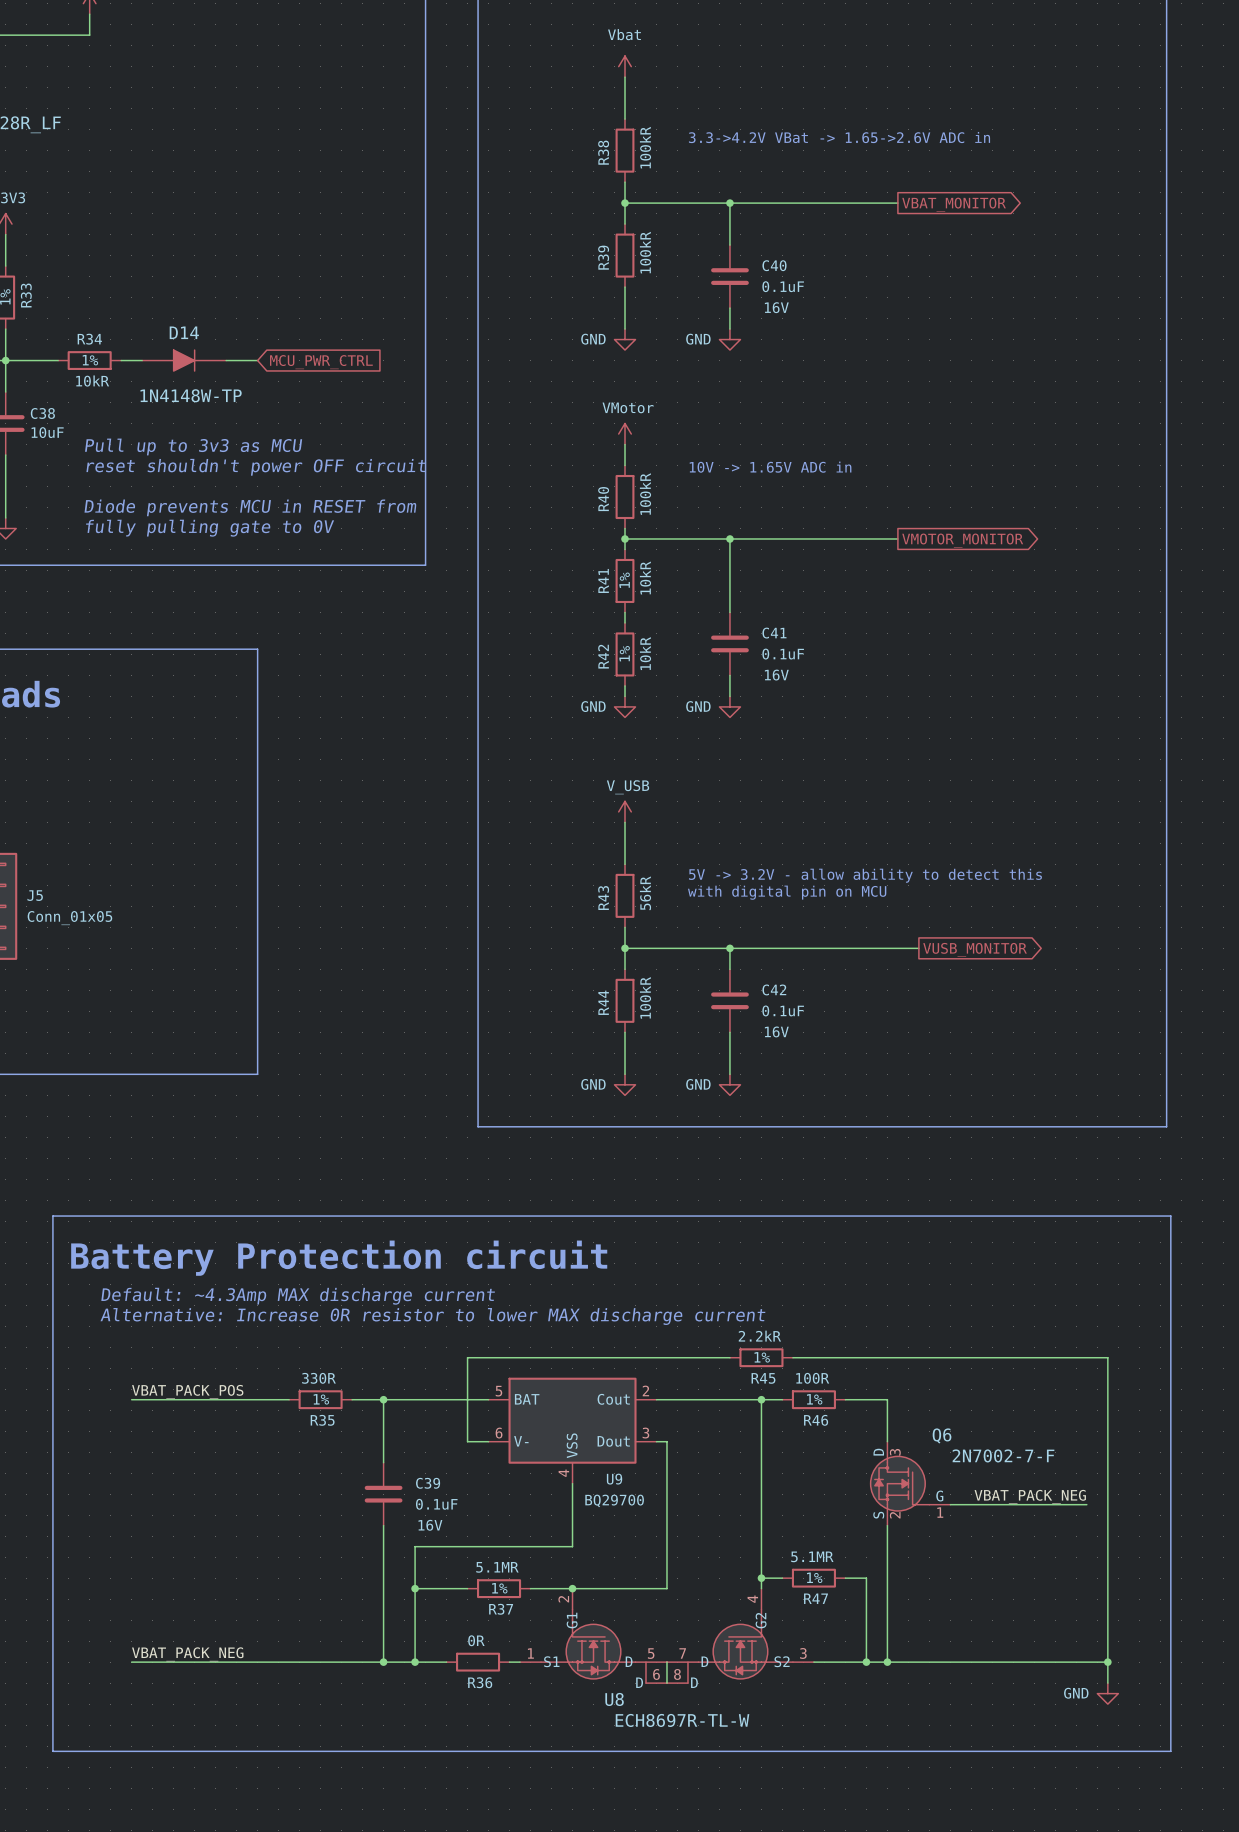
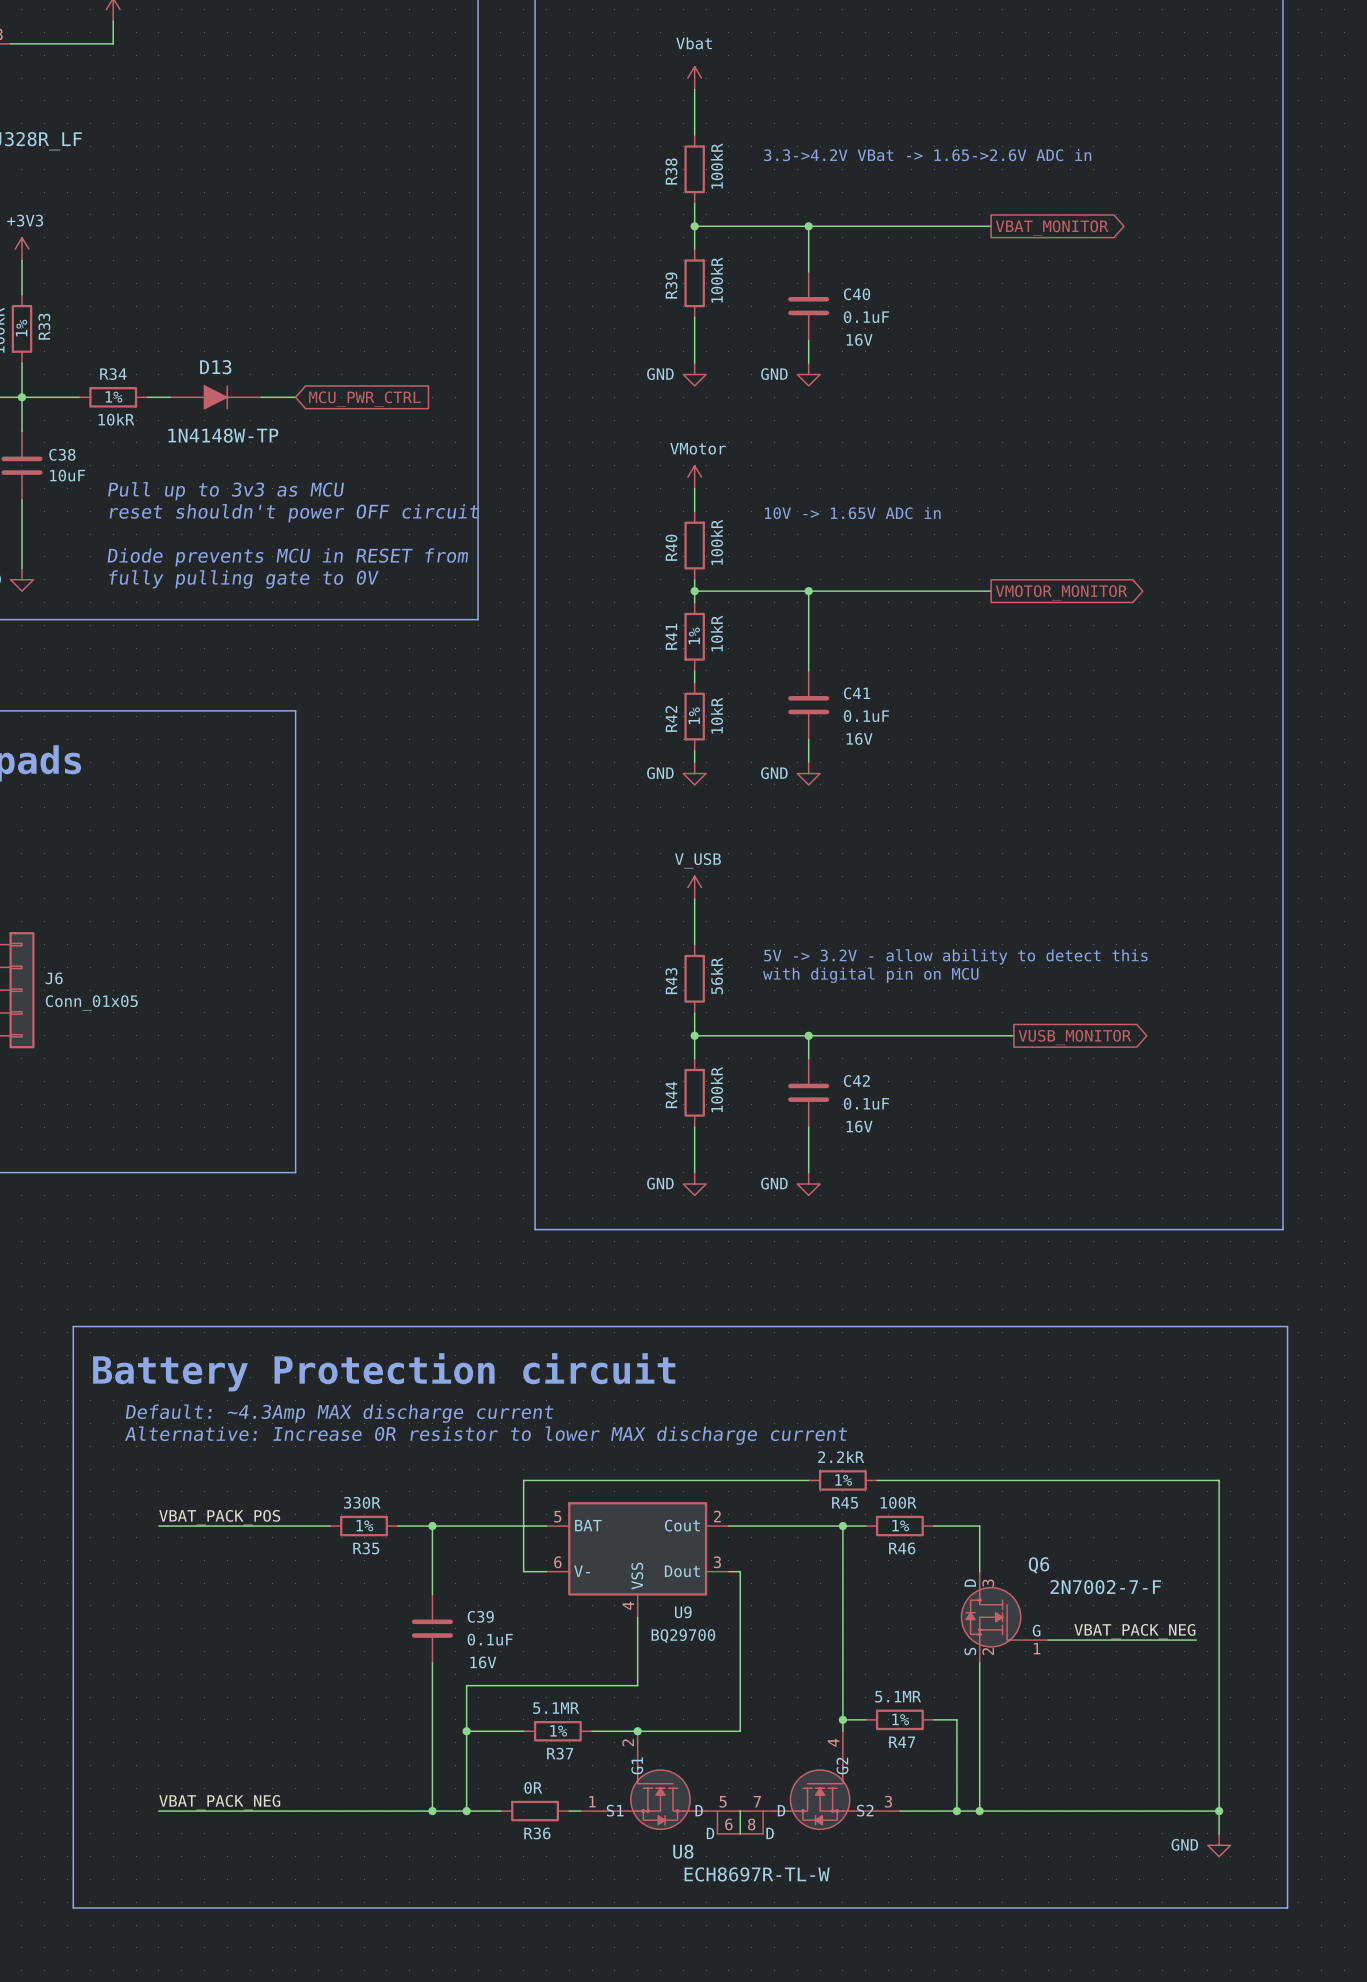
D14 name: D14 (184, 332) -> D13 (215, 367)
J5 name: J5 (35, 895) -> J6 (54, 978)

